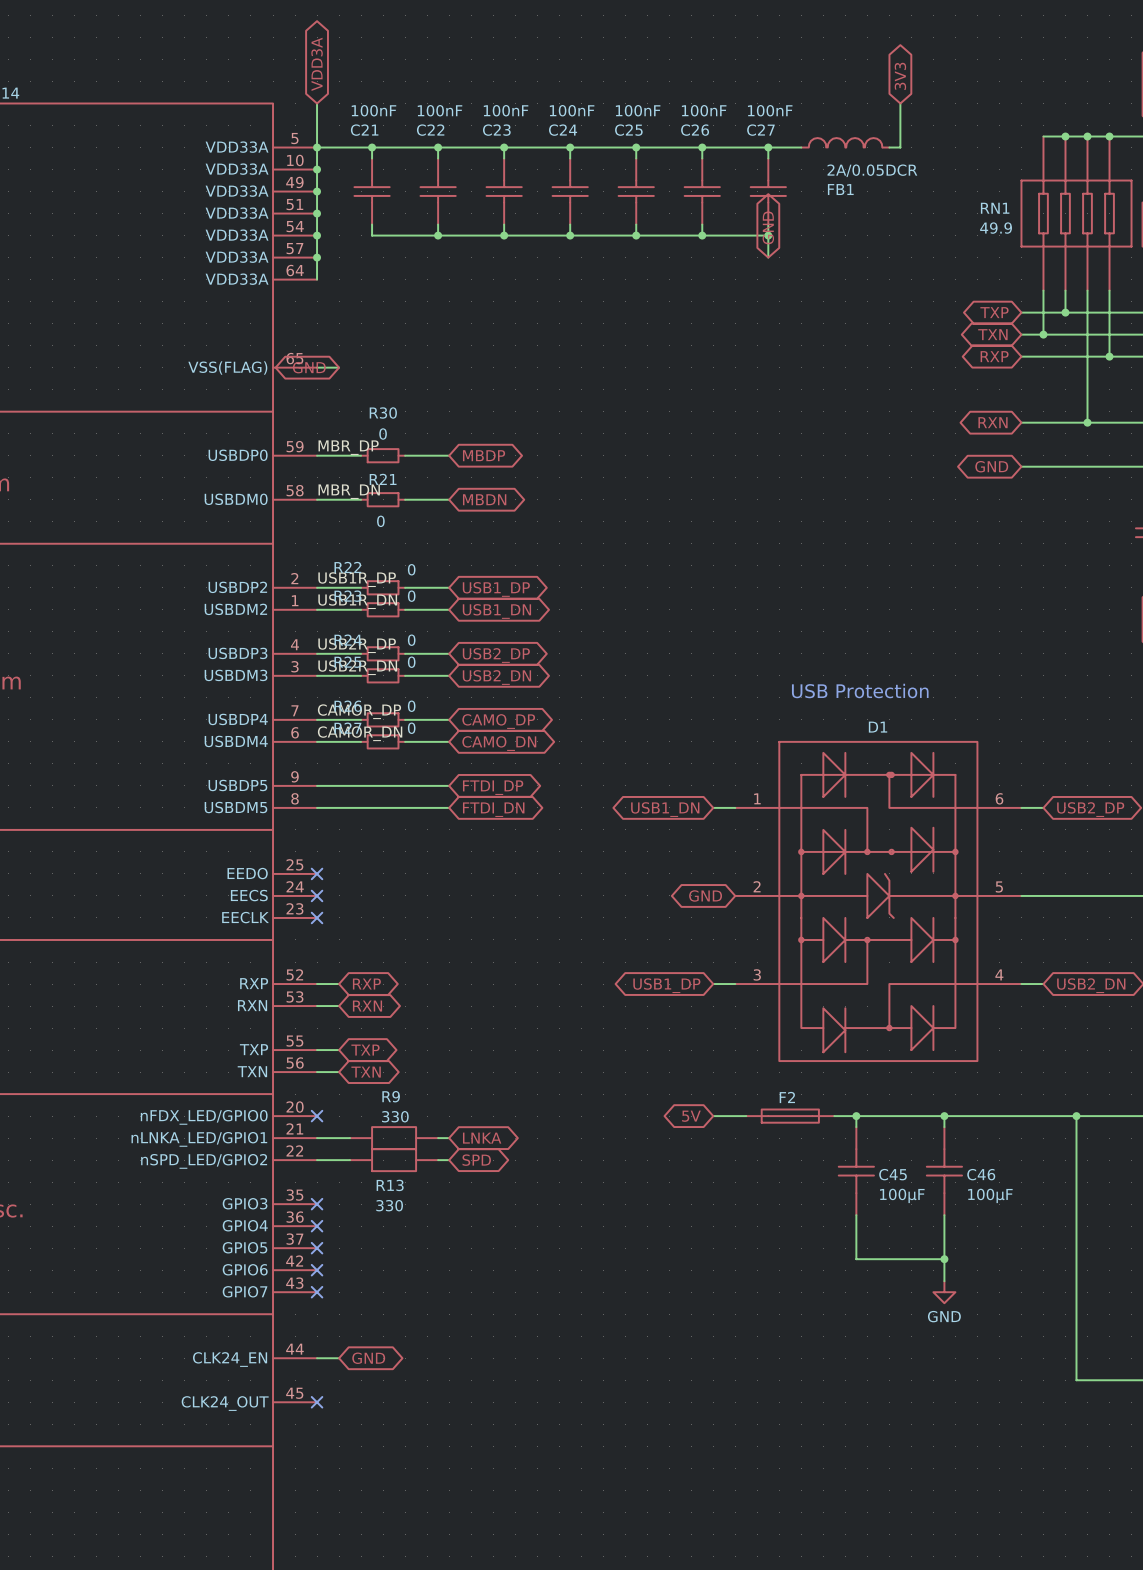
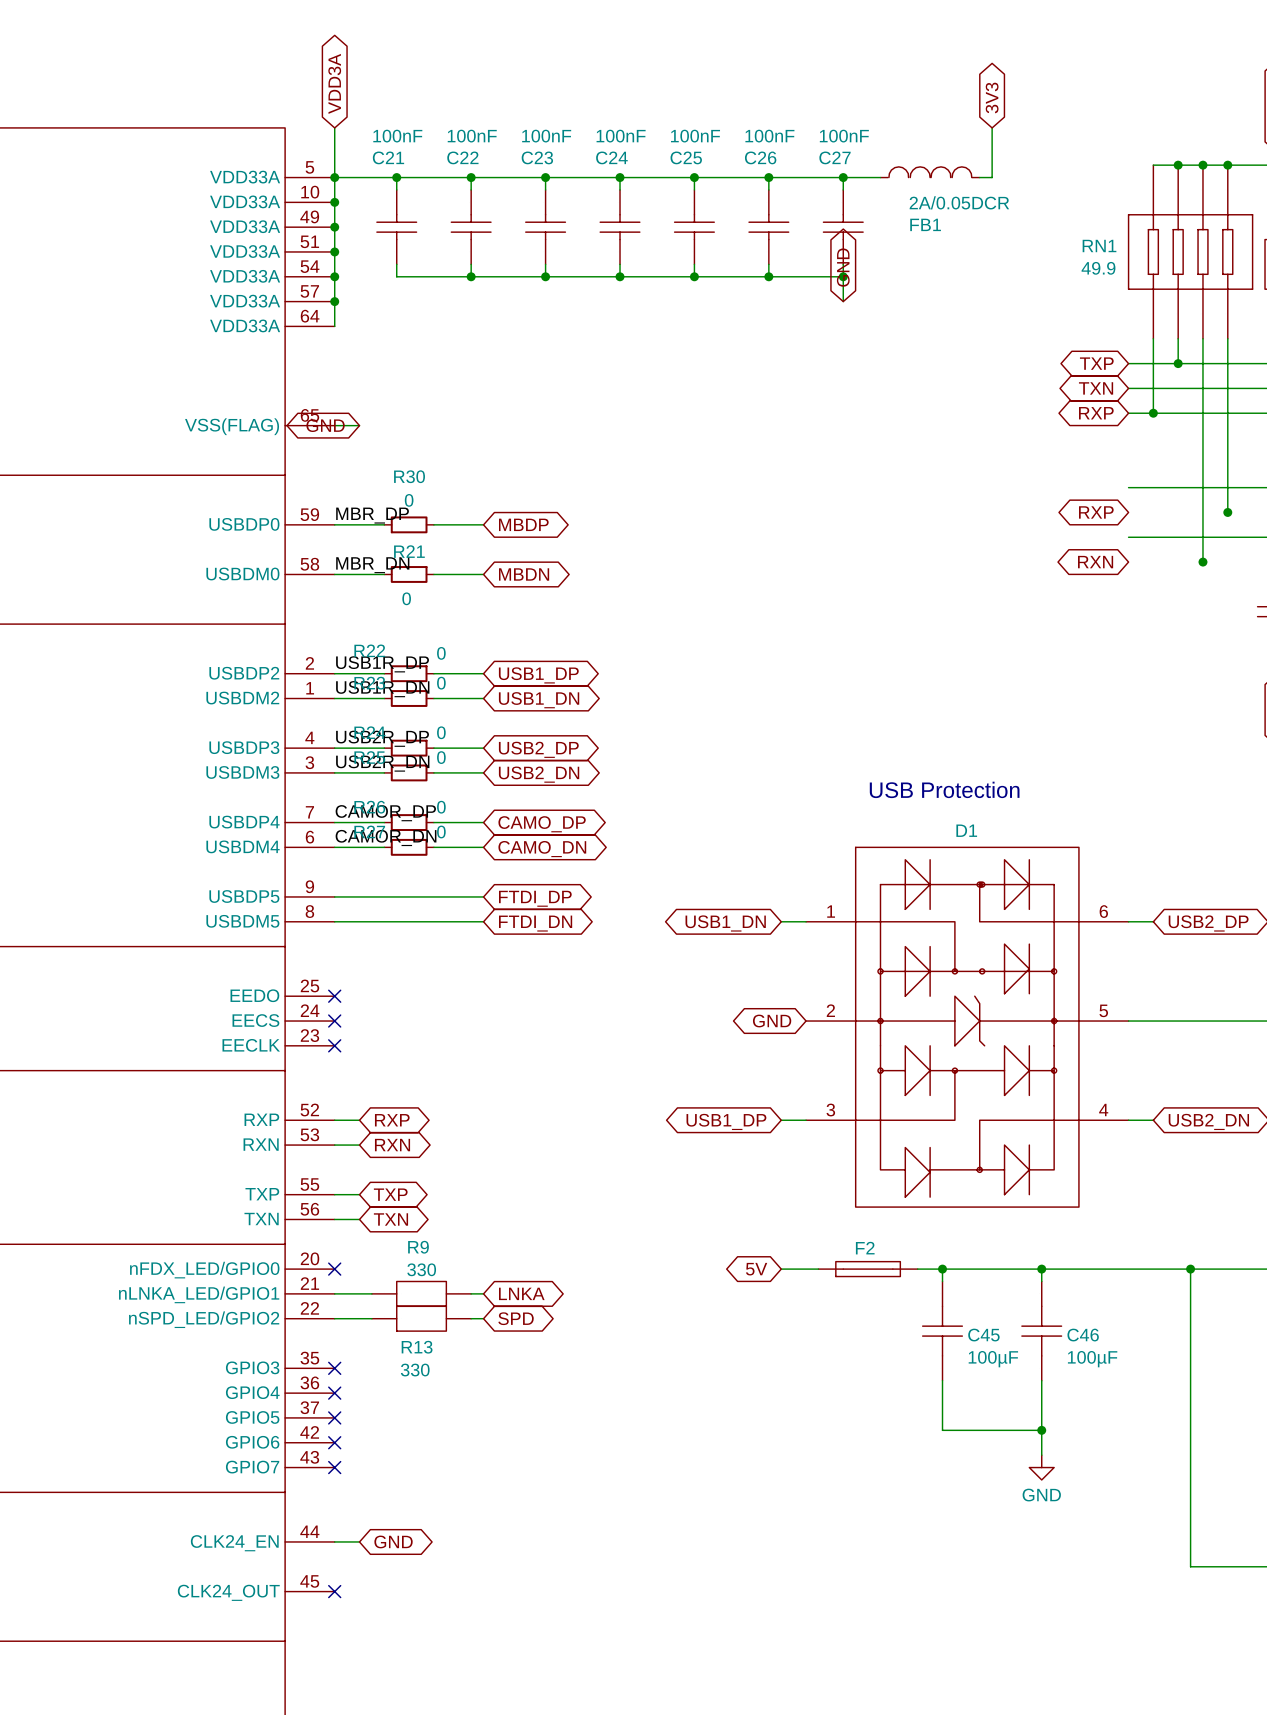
wire: none -> (1153, 388) (1153, 413)
junction position: (1043, 334) -> (1153, 413)
wire: none -> (1227, 413) (1227, 512)
junction: (1109, 356) -> none
global label position: RXN (993, 422) -> RXN (1095, 562)
wire: none -> (1202, 487) (1202, 562)
junction: (1087, 422) -> none
global label: none -> RXP (1096, 512)
junction: none -> (1227, 512)
global label: GND (991, 466) -> none
junction: none -> (1202, 562)

